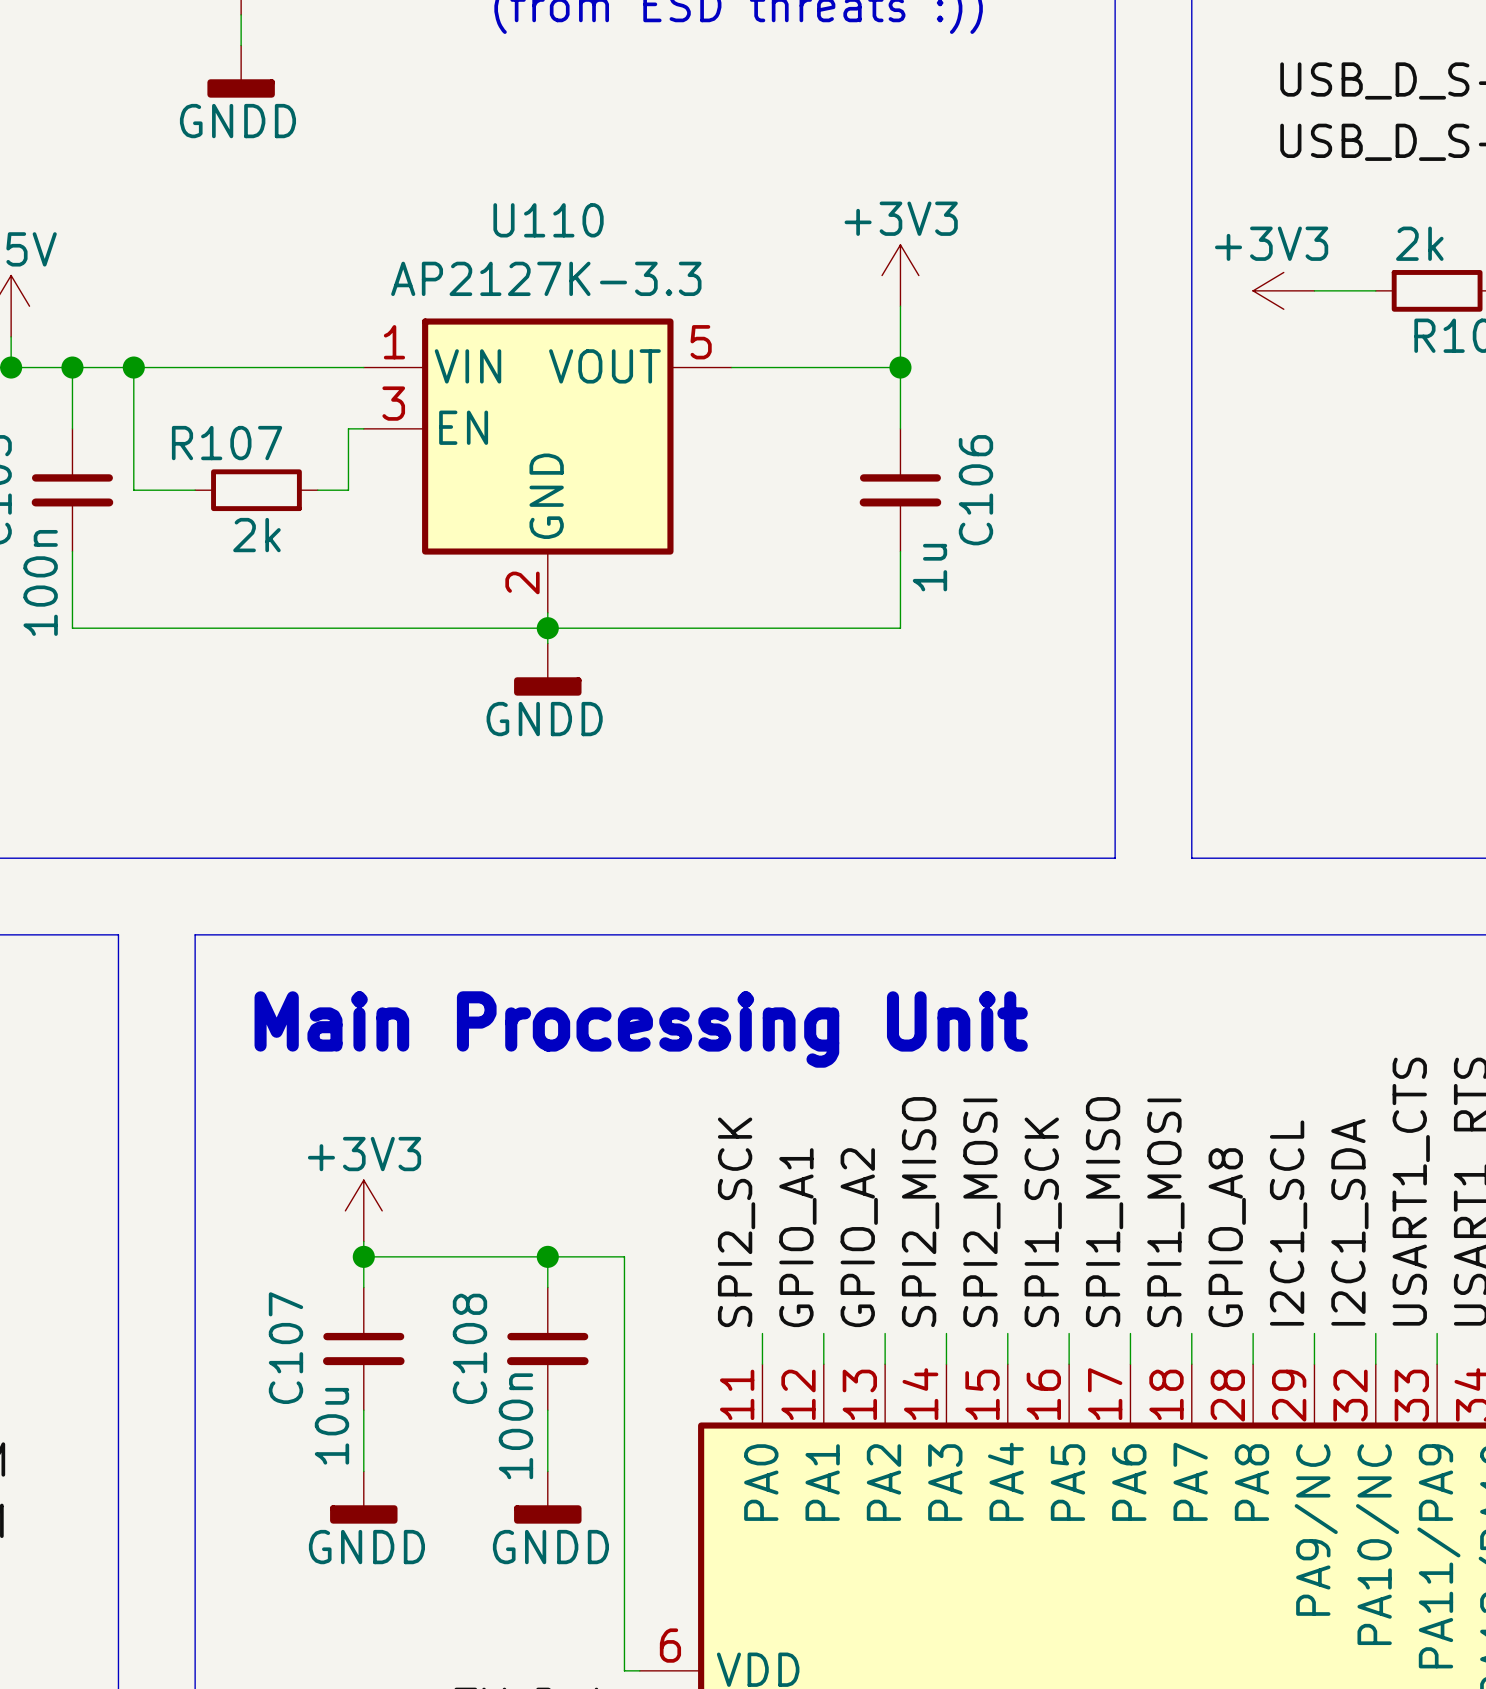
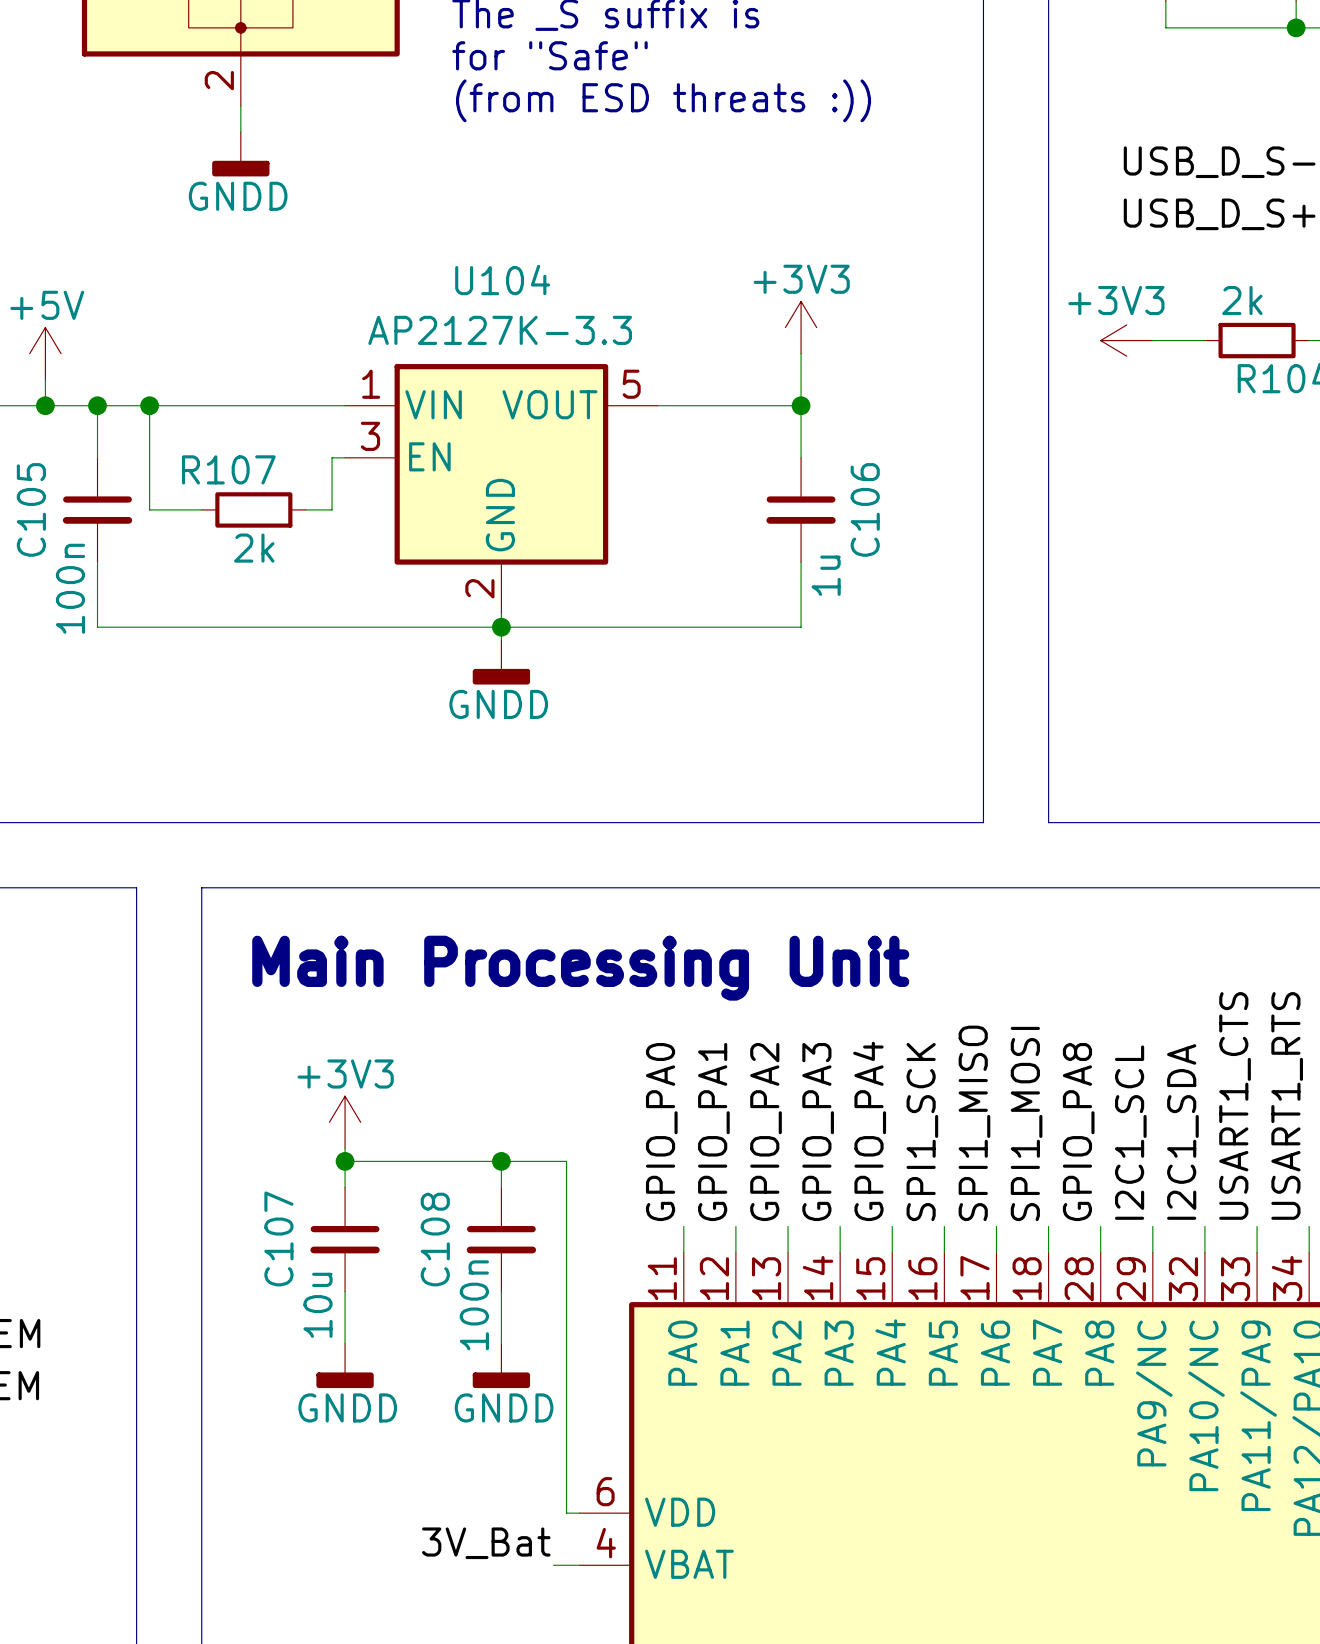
U110 name: U110 (548, 220) -> U104 (502, 280)
label: SPI2_MISO (920, 1212) -> GPIO_PA3 (818, 1132)
label: SPI2_MOSI (981, 1212) -> GPIO_PA4 (869, 1131)
label: SPI2_SCK (736, 1222) -> GPIO_PA0 (661, 1132)
label: GPIO_A1 (797, 1237) -> GPIO_PA1 (713, 1132)
label: GPIO_A2 (859, 1237) -> GPIO_PA2 (766, 1132)
label: GPIO_A8 (1227, 1237) -> GPIO_PA8 (1078, 1132)

